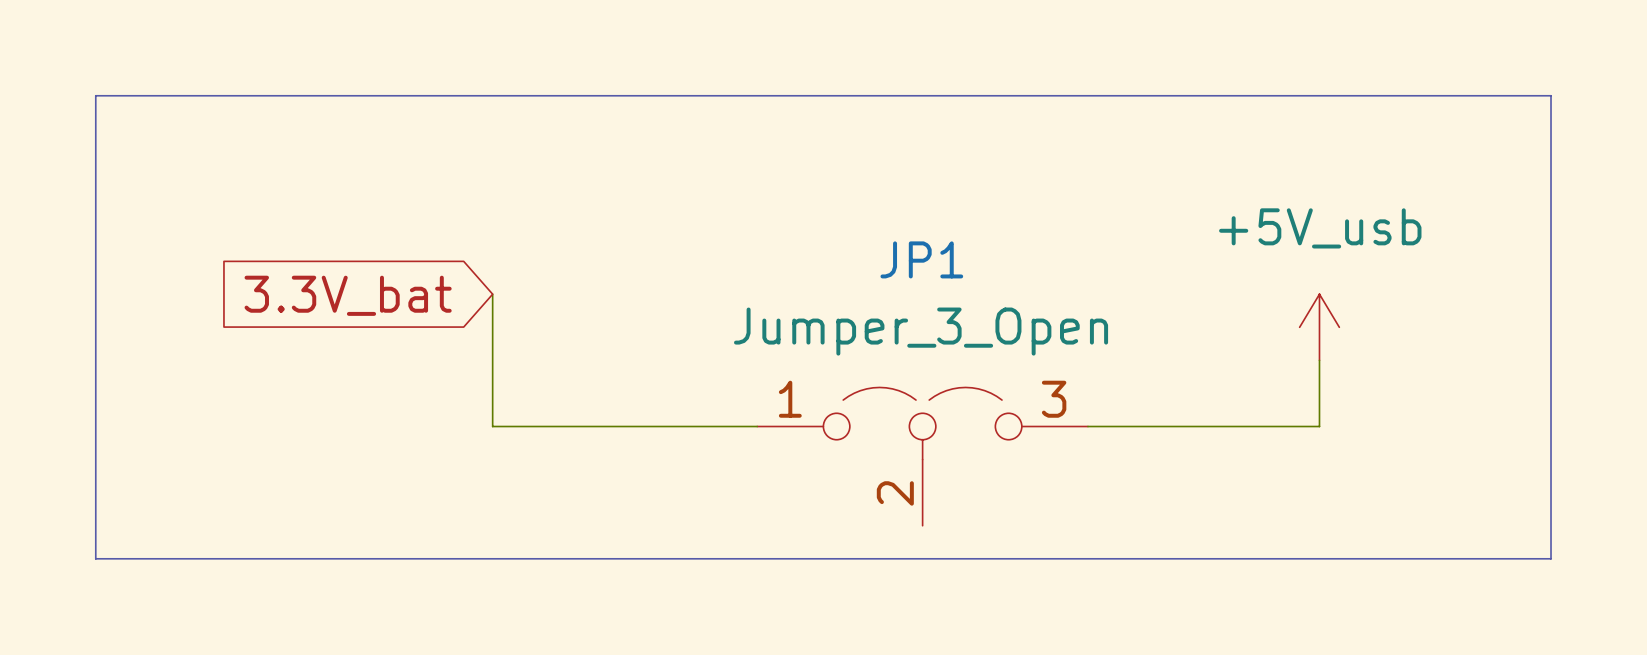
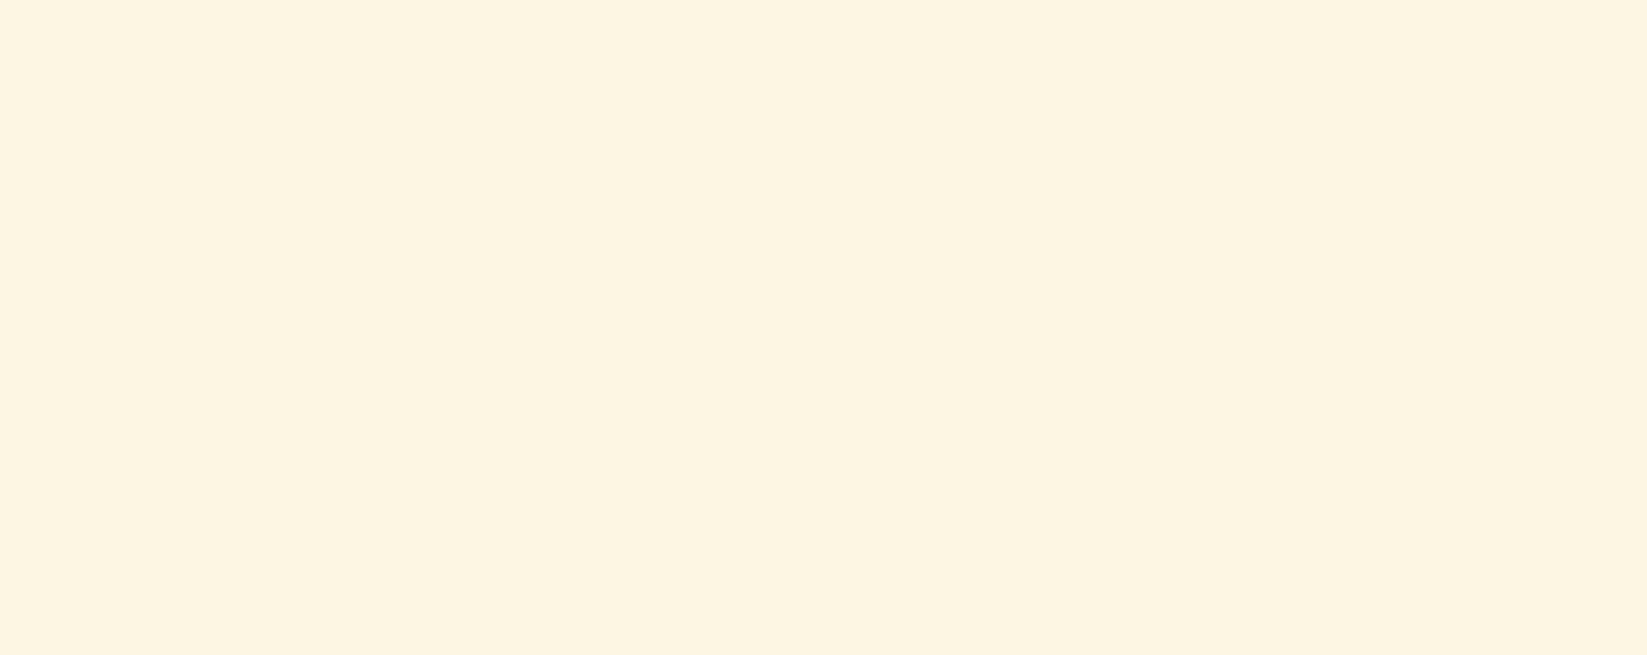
line: (95, 95) (1551, 95) (1551, 558) (95, 558) (95, 95) -> none
wire: (492, 294) (492, 426) (757, 426) -> none
global label: 3.3V_bat (348, 295) -> none
power symbol: +5V_usb (1319, 327) -> none
wire: (1319, 360) (1319, 426) (1087, 426) -> none
JP1: Jumper_3_Open (922, 456) -> none

